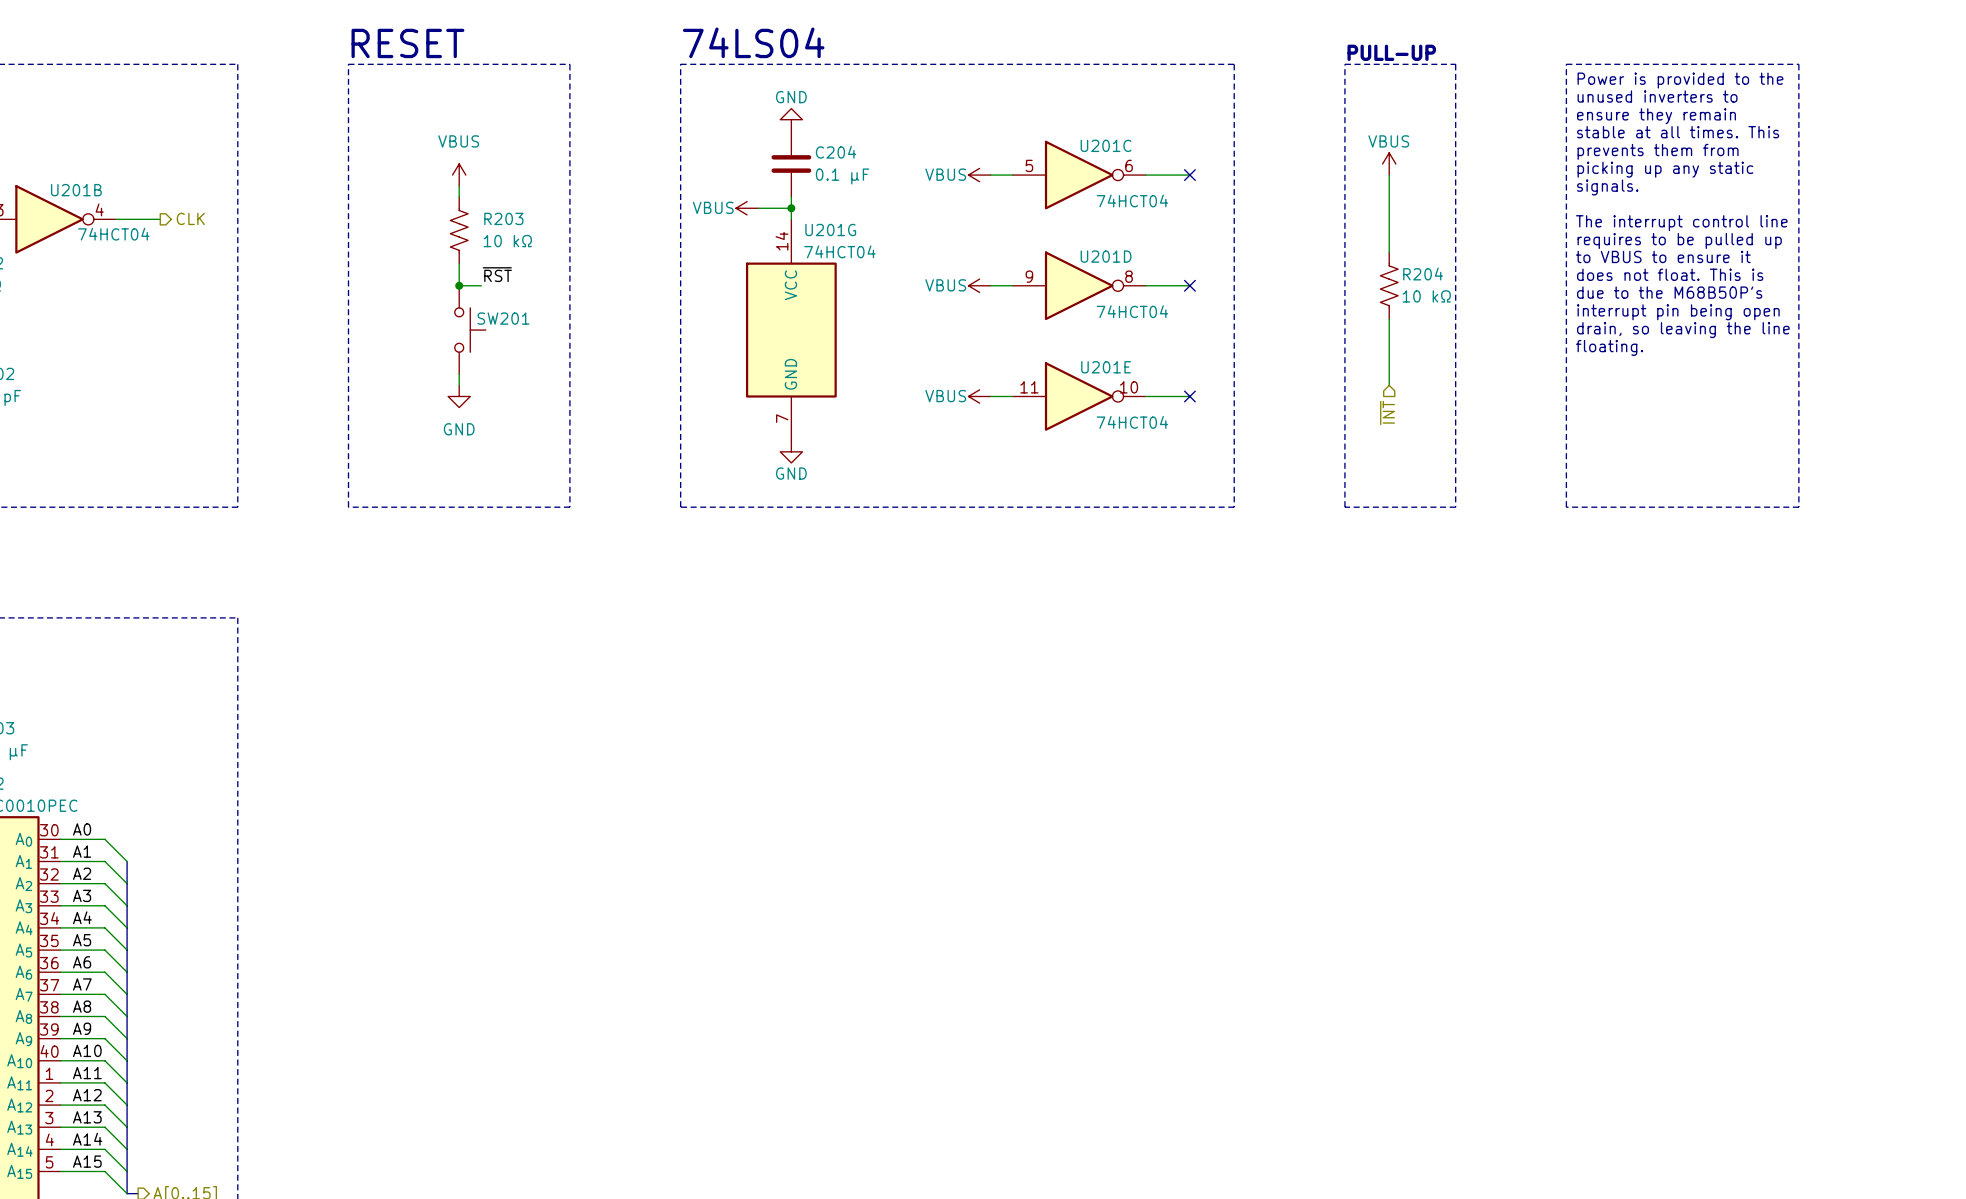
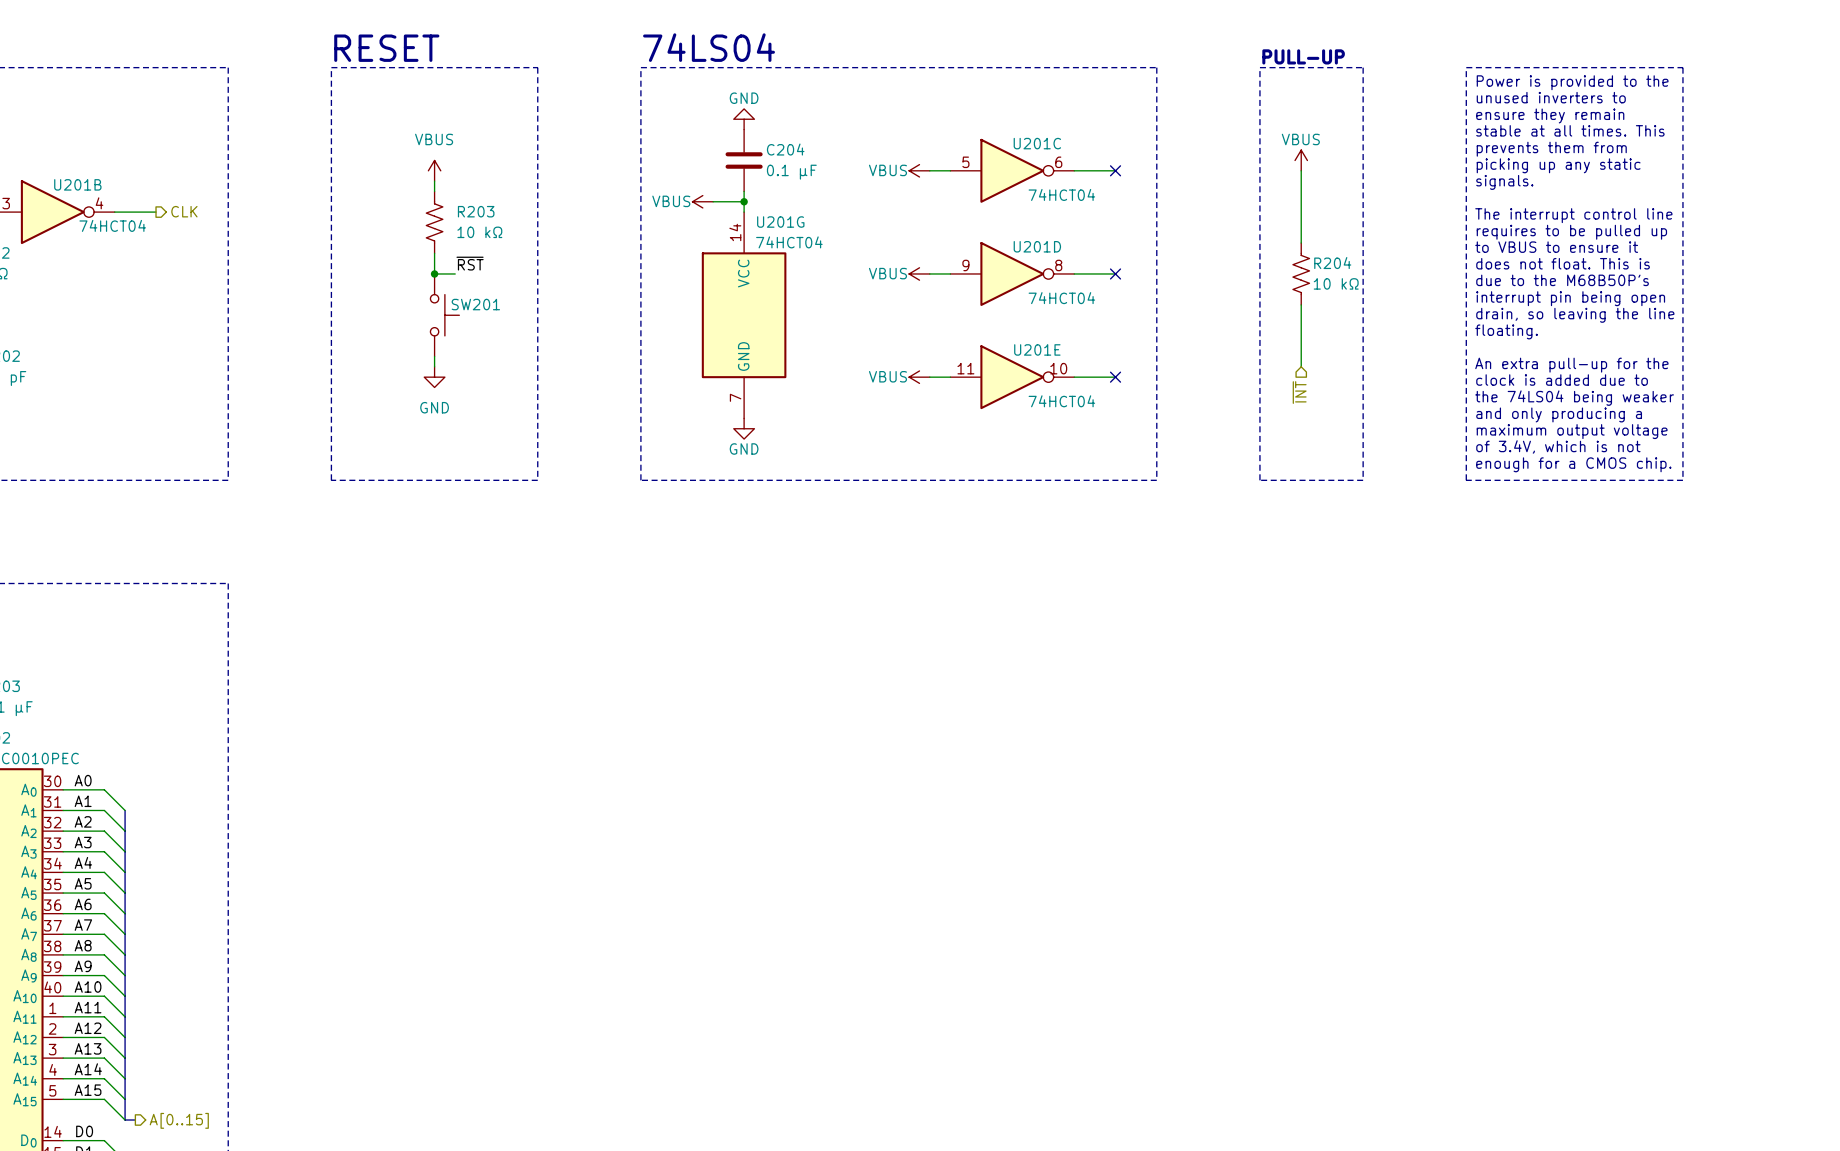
text: none -> An extra pull-up for the (1571, 365)
text: none -> clock is added due to (1562, 380)
text: none -> the 74LS04 being weaker (1574, 398)
text: none -> and only producing a (1559, 414)
text: none -> maximum output voltage (1572, 431)
text: none -> of 3.4V, which is not (1558, 446)
text: none -> enough for a CMOS chip. (1573, 464)

